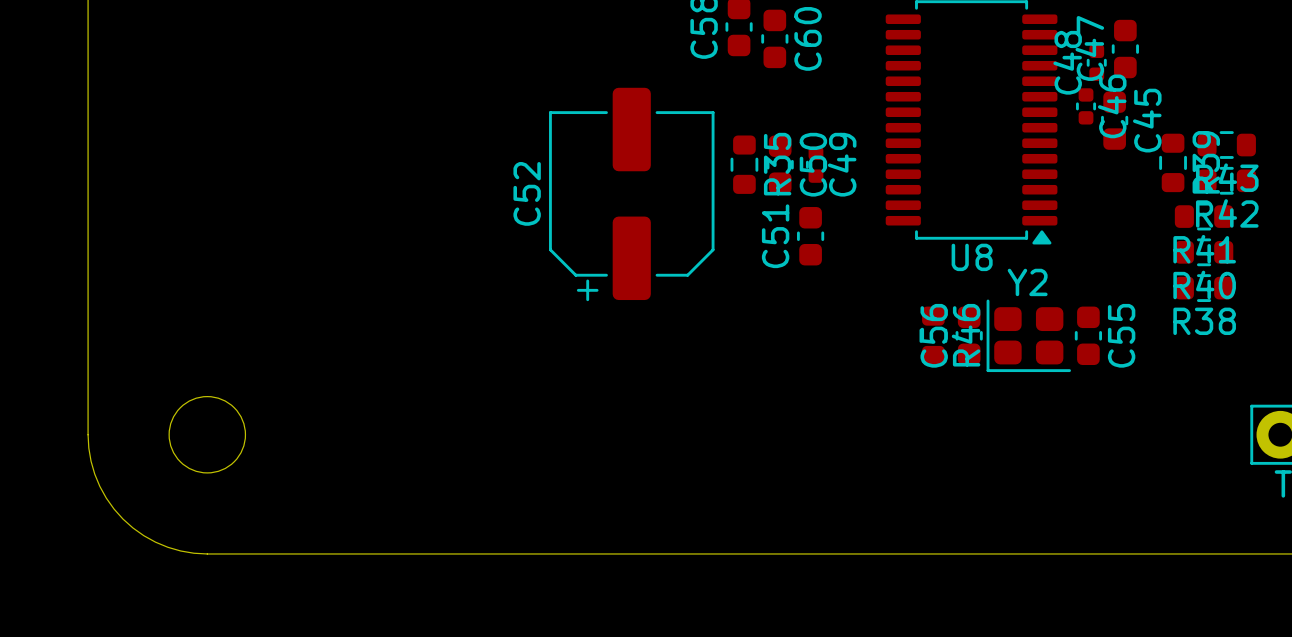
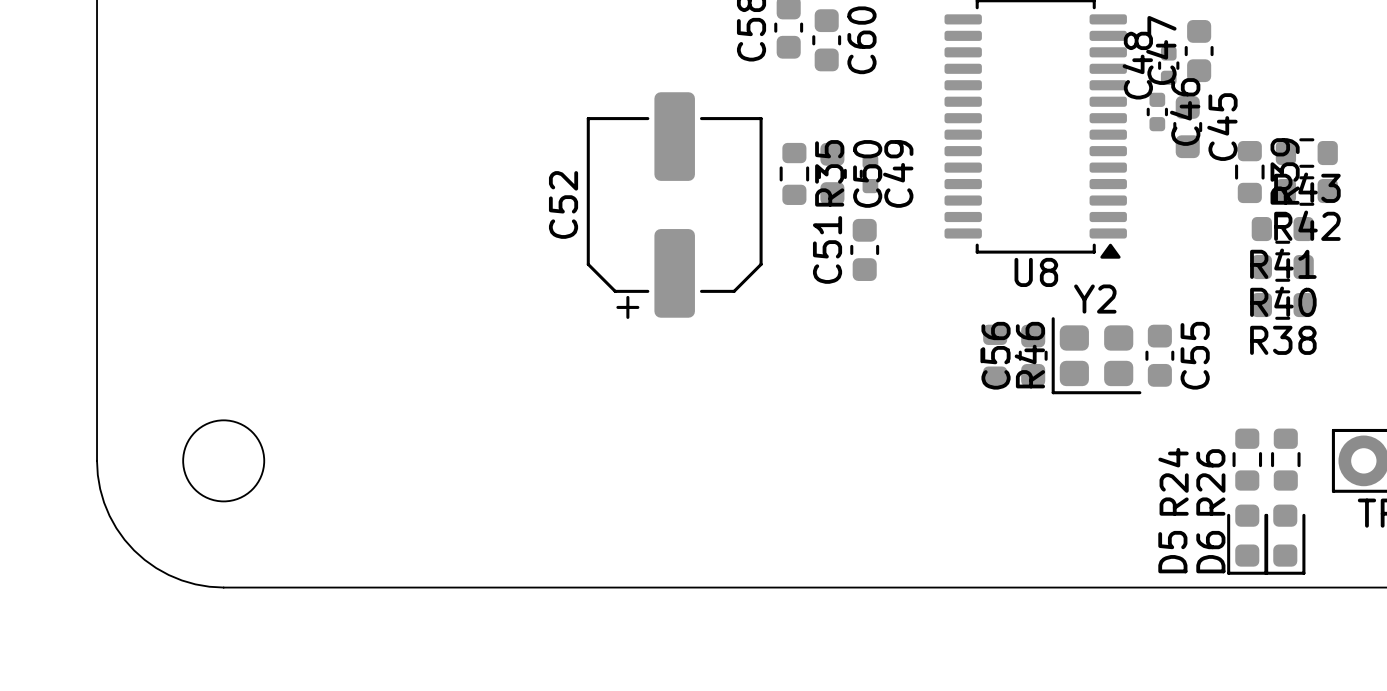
R24: none -> (1247, 459)
R26: none -> (1285, 459)
D5: none -> (1247, 539)
D6: none -> (1285, 539)

